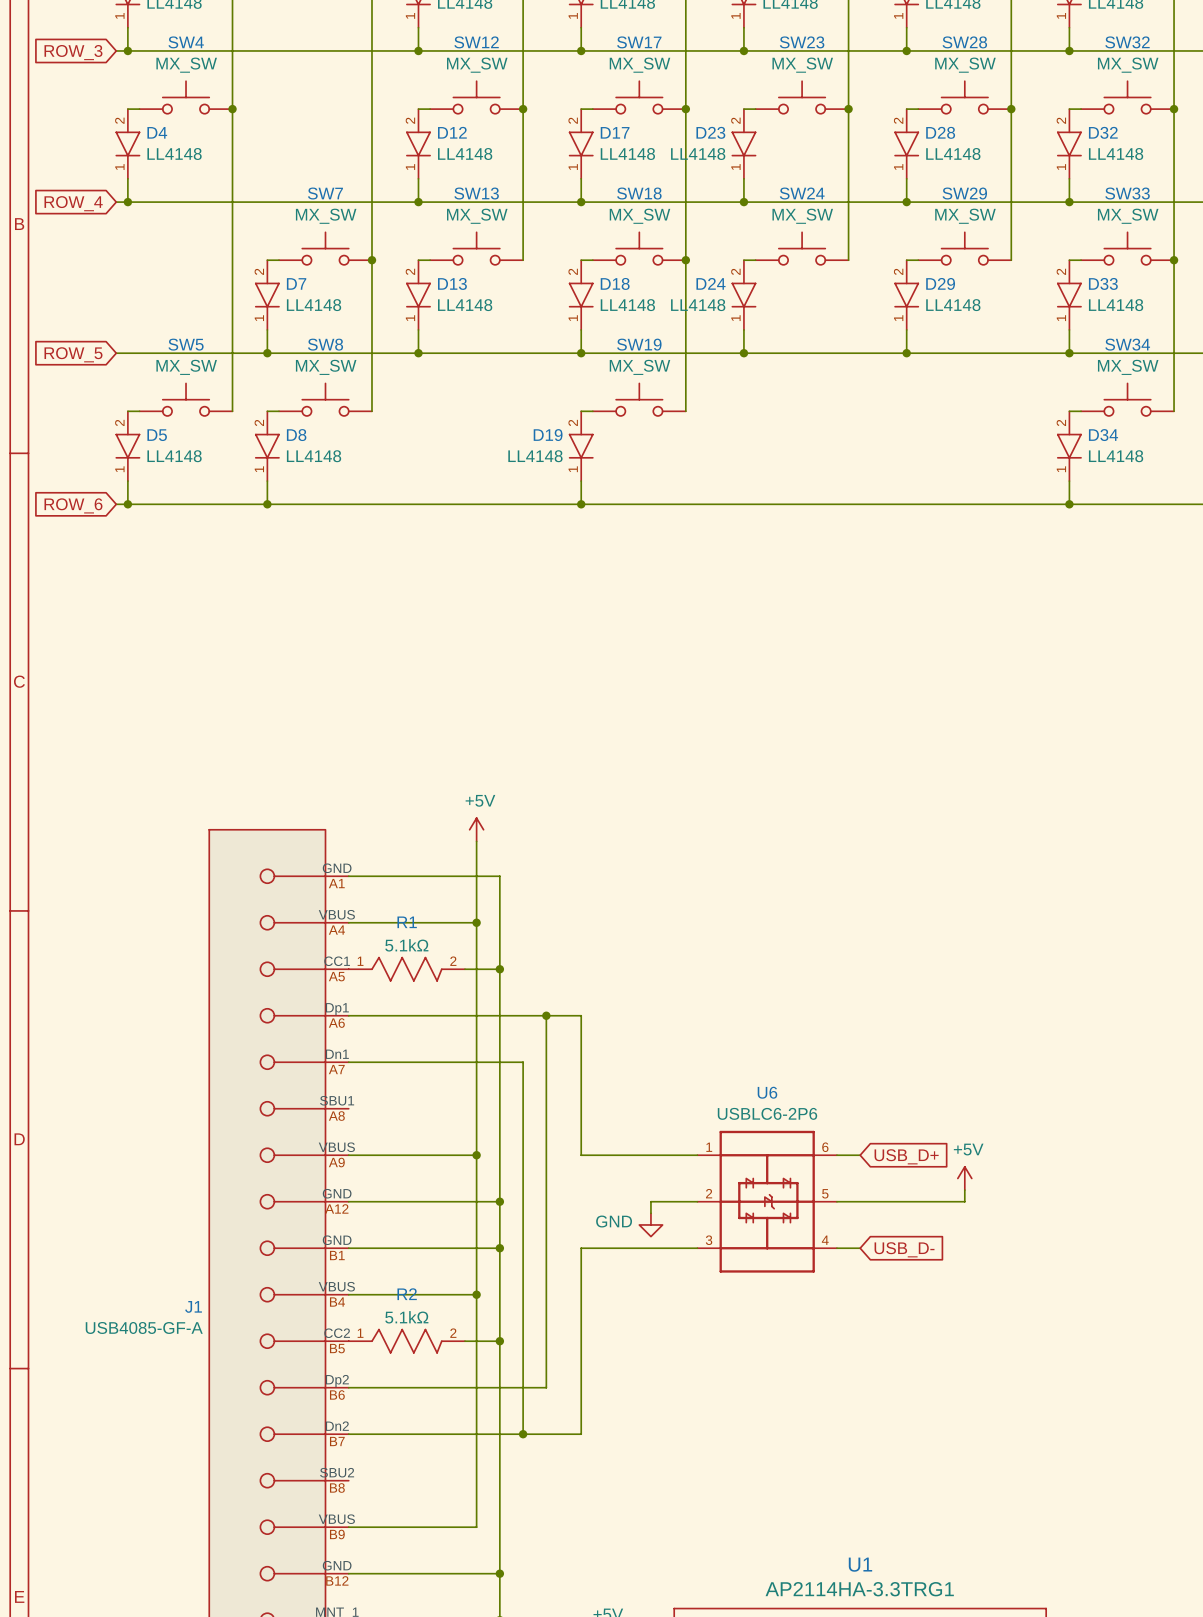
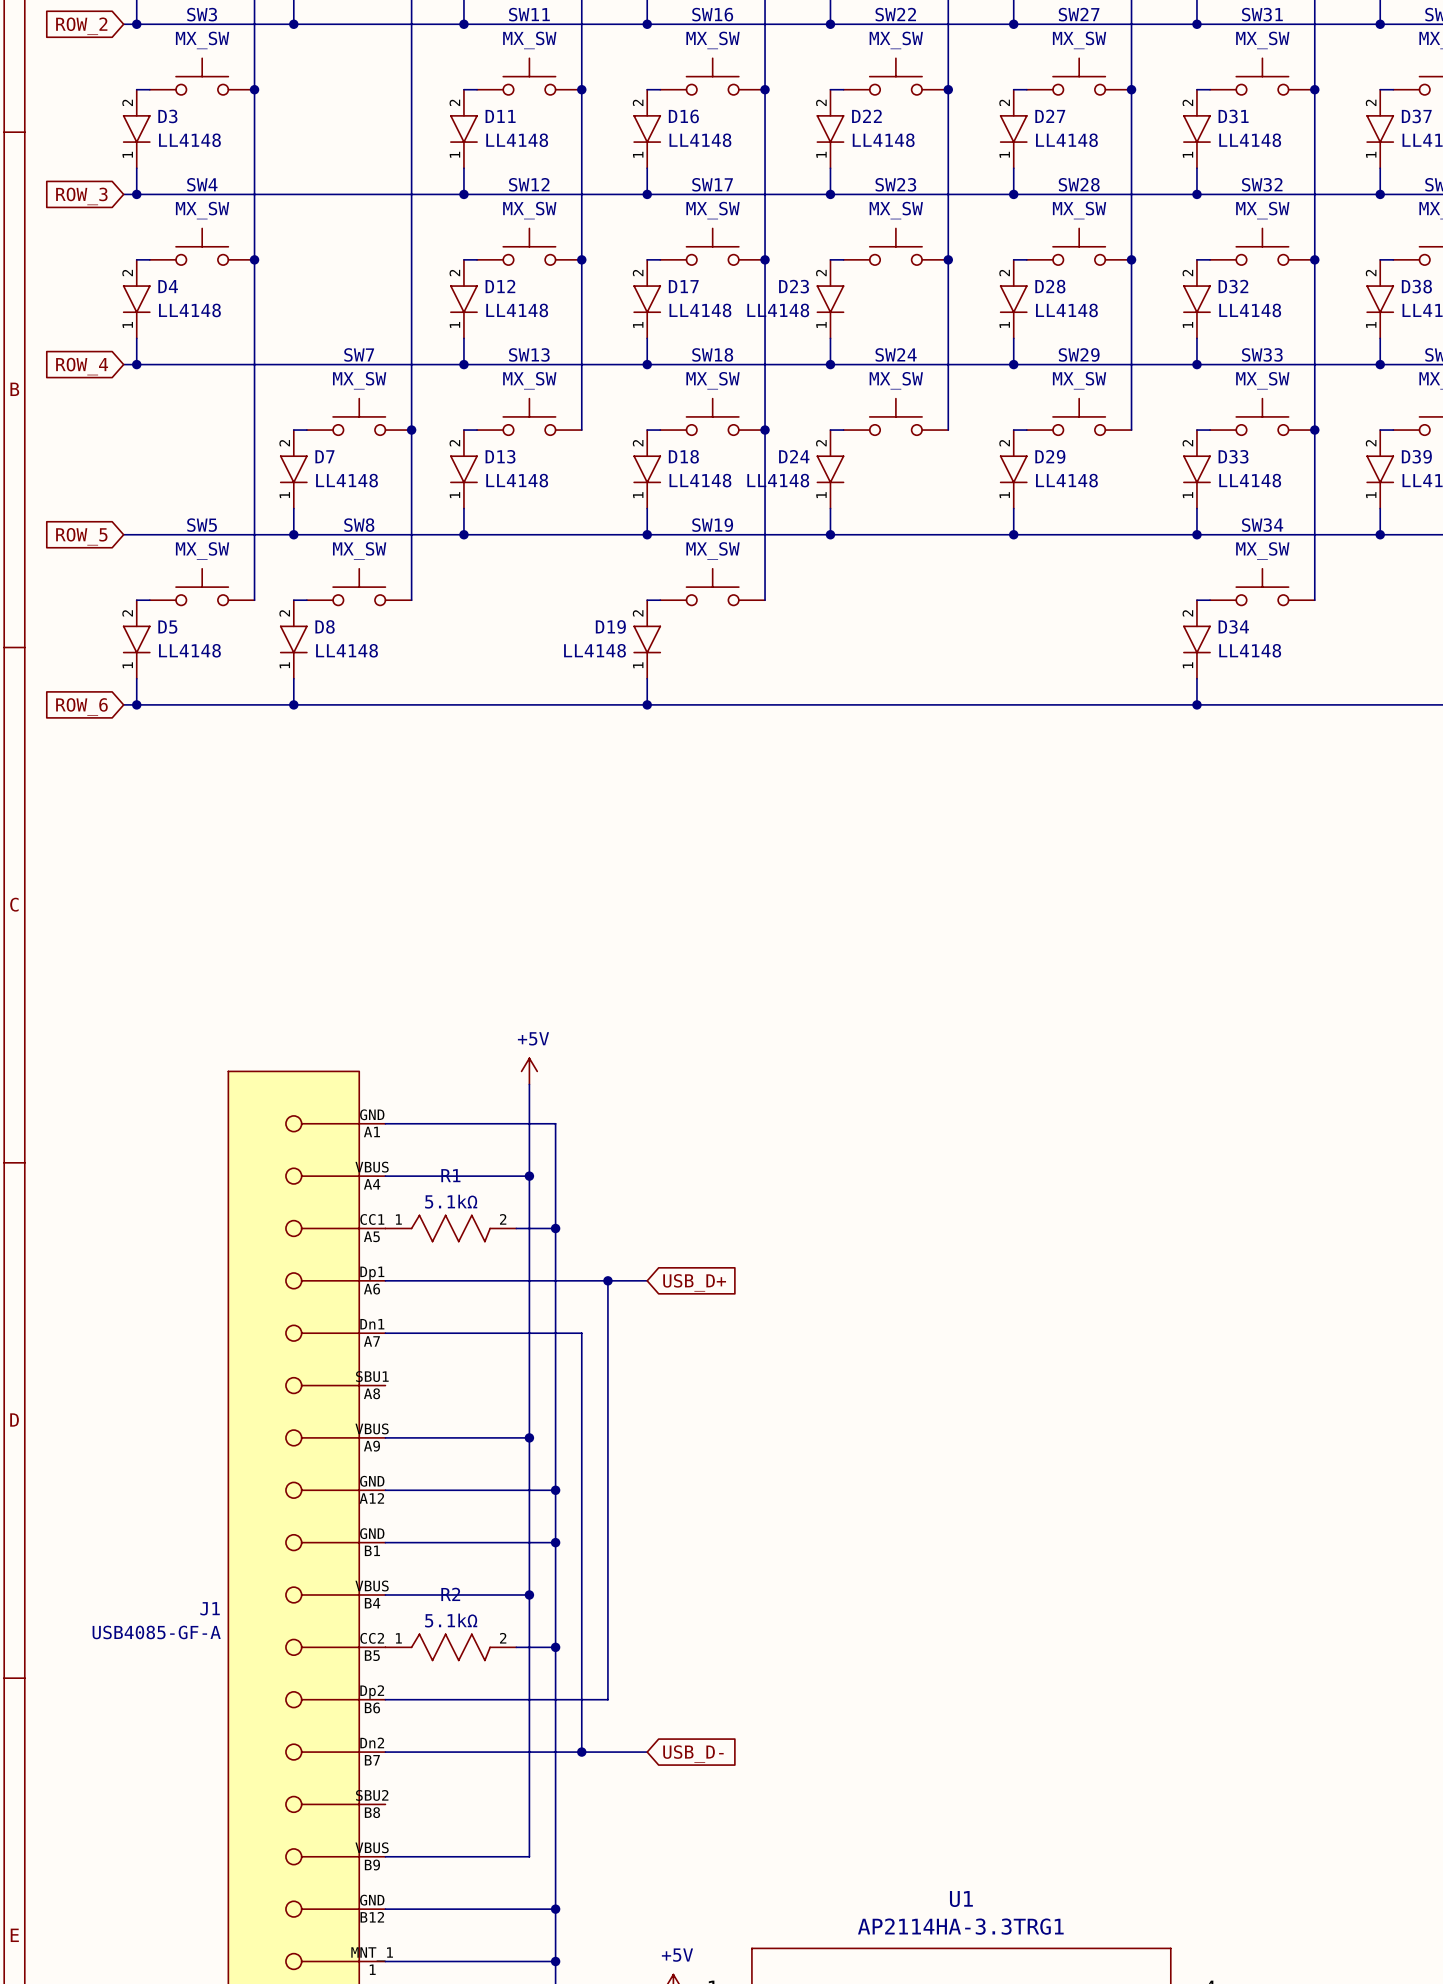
wire: (581, 1015) (581, 1155) (697, 1155) -> none
global label: none -> USB_D+ (694, 1282)
wire: (836, 1155) (860, 1155) -> none
global label: USB_D+ (906, 1156) -> none
power symbol: +5V (964, 1178) -> none
wire: (964, 1190) (964, 1201) (836, 1201) -> none
wire: (697, 1201) (650, 1201) (650, 1213) -> none
U6: USBLC6-2P6 (767, 1201) -> none
power symbol: GND (650, 1224) -> none
wire: (697, 1248) (581, 1248) (581, 1434) -> none
wire: (836, 1248) (860, 1248) -> none
global label: USB_D- (904, 1249) -> none
global label: none -> USB_D- (693, 1754)

